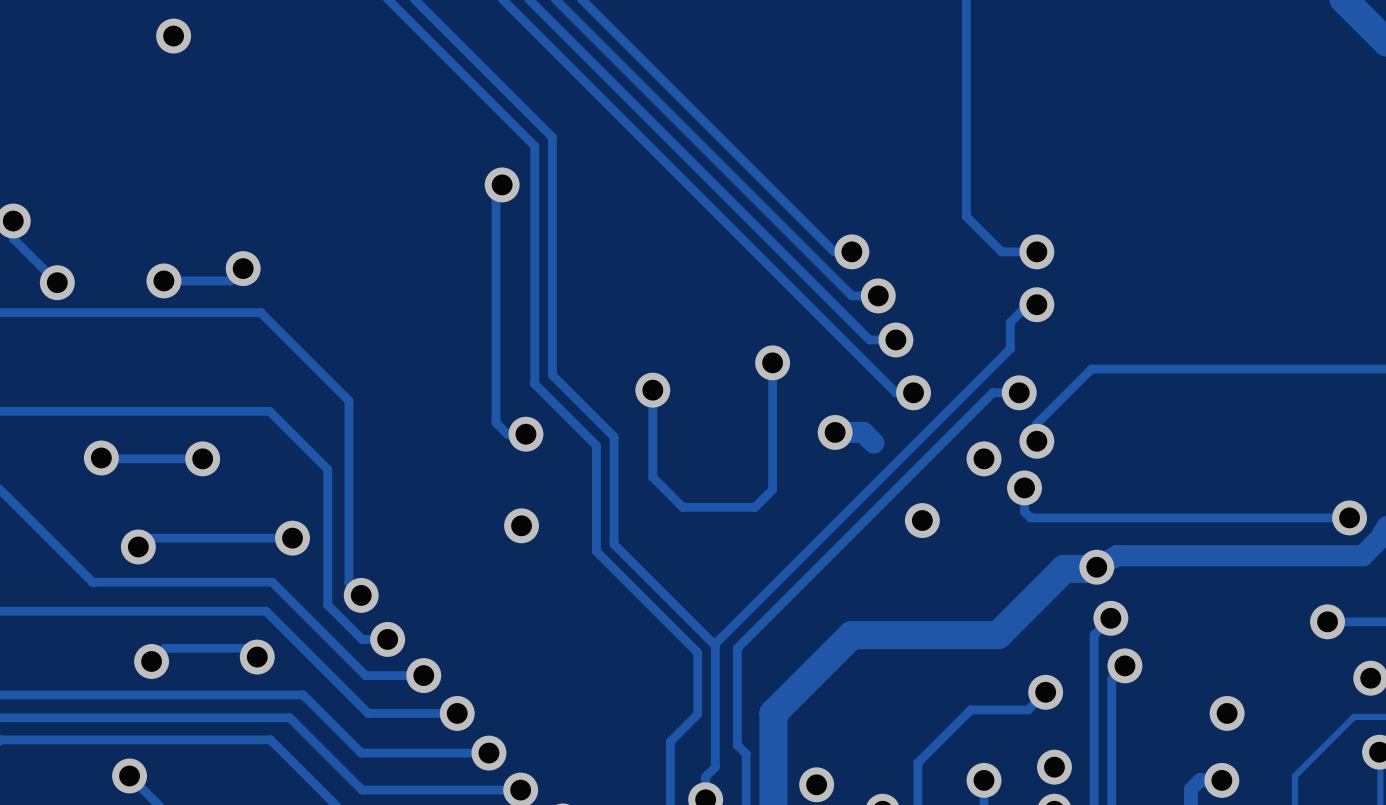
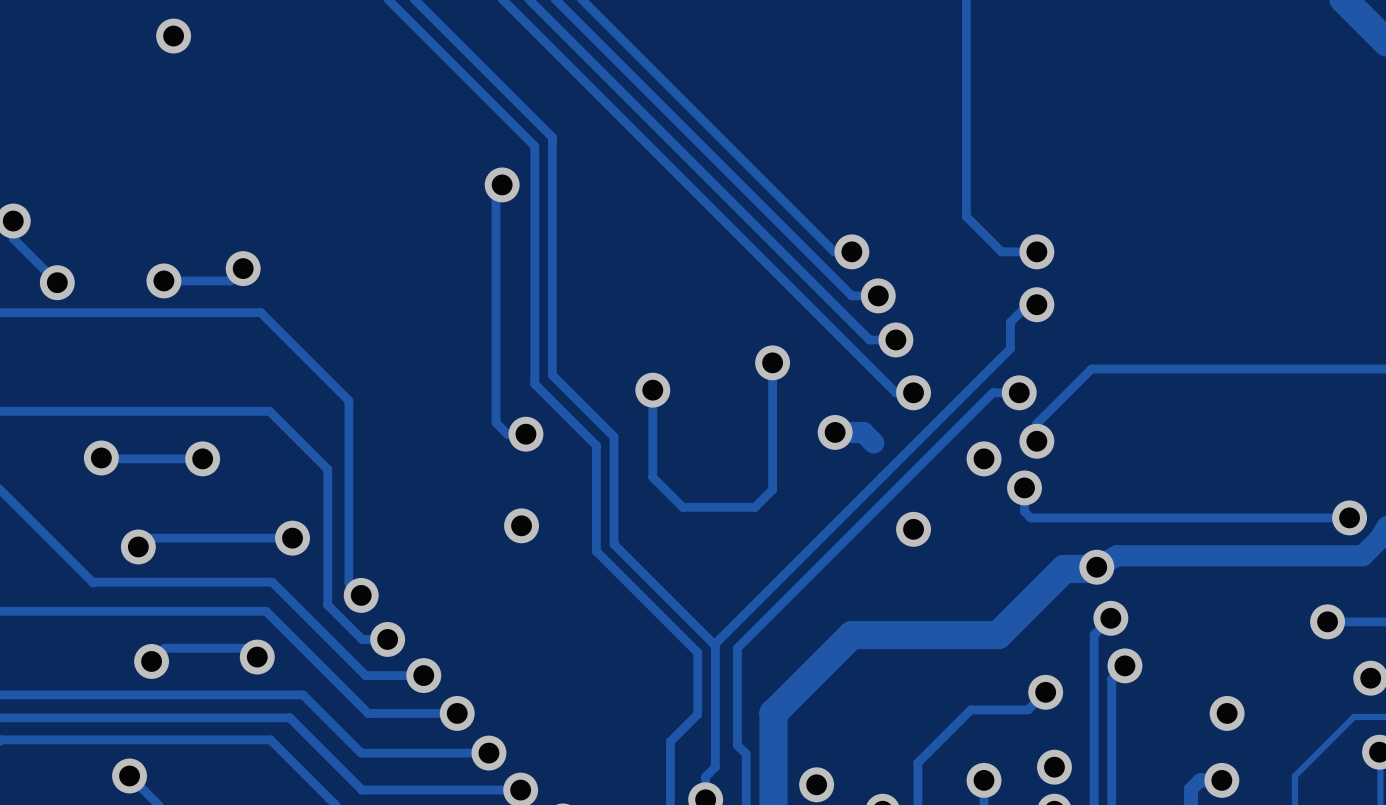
via position: (922, 520) -> (913, 529)

